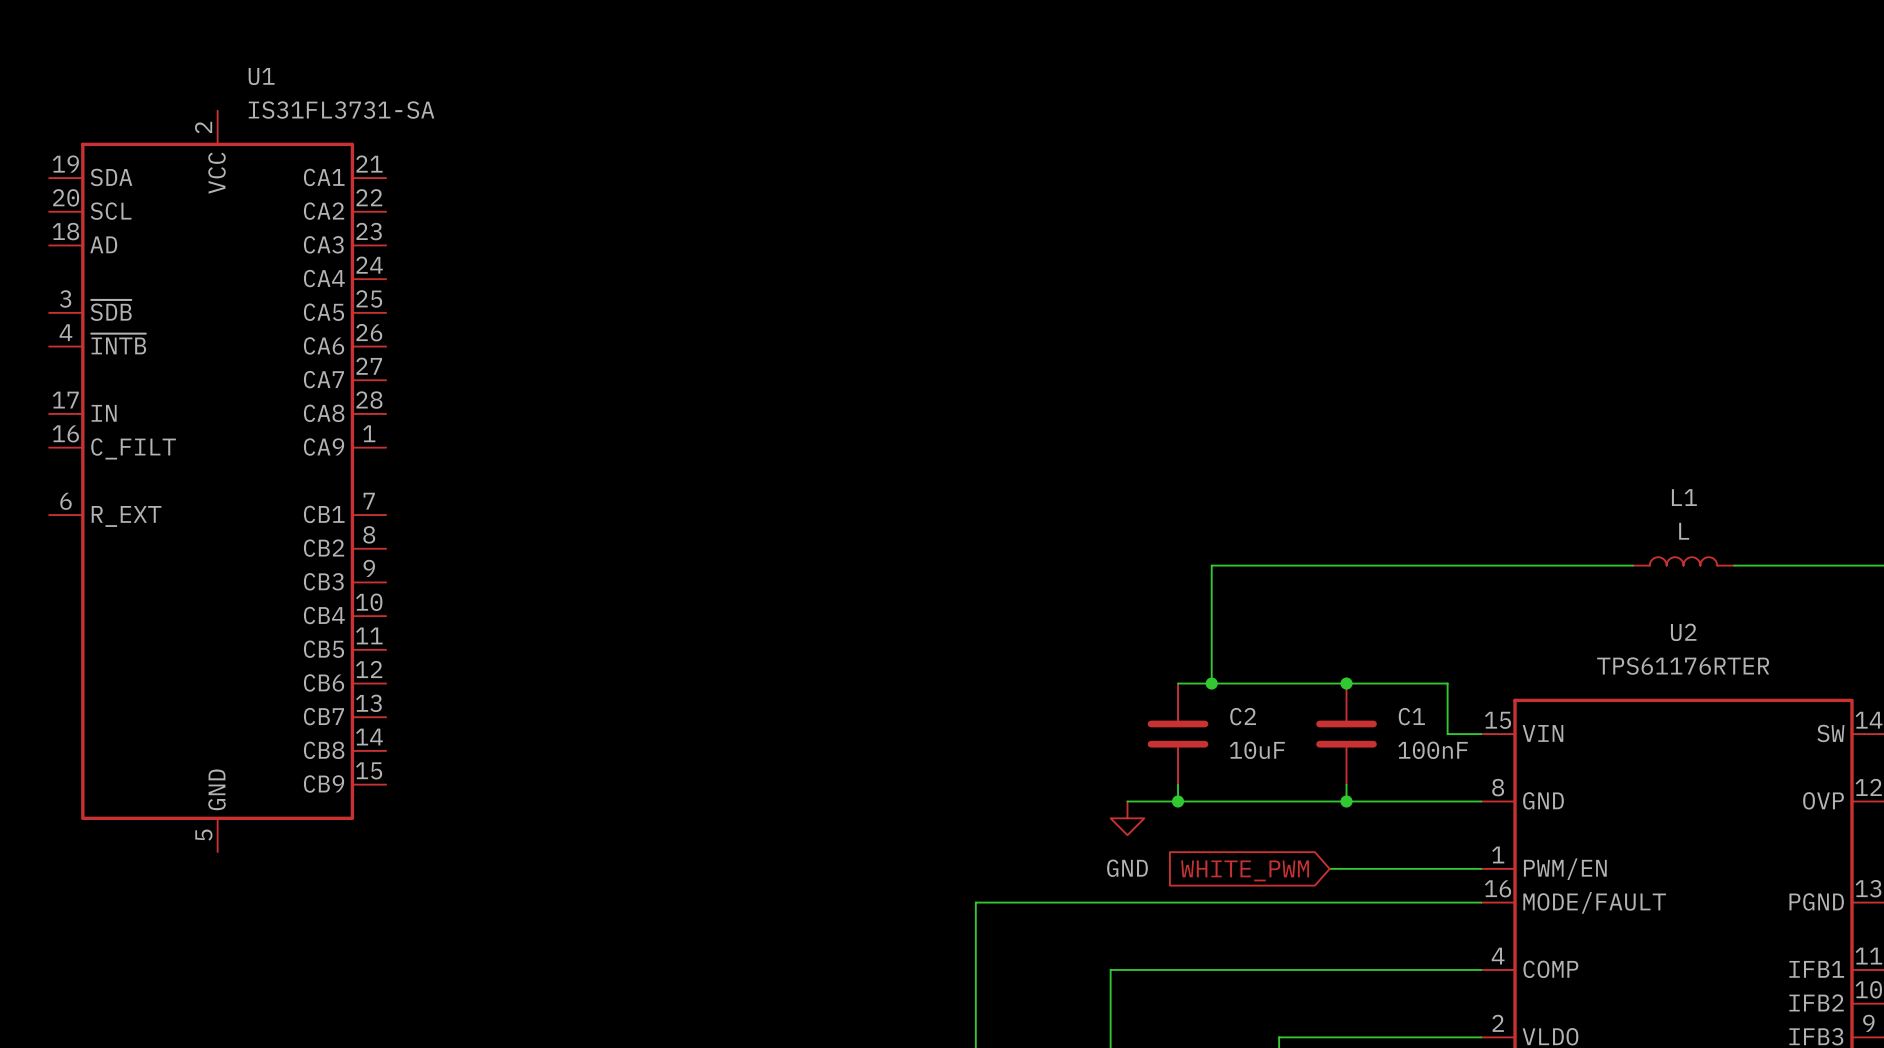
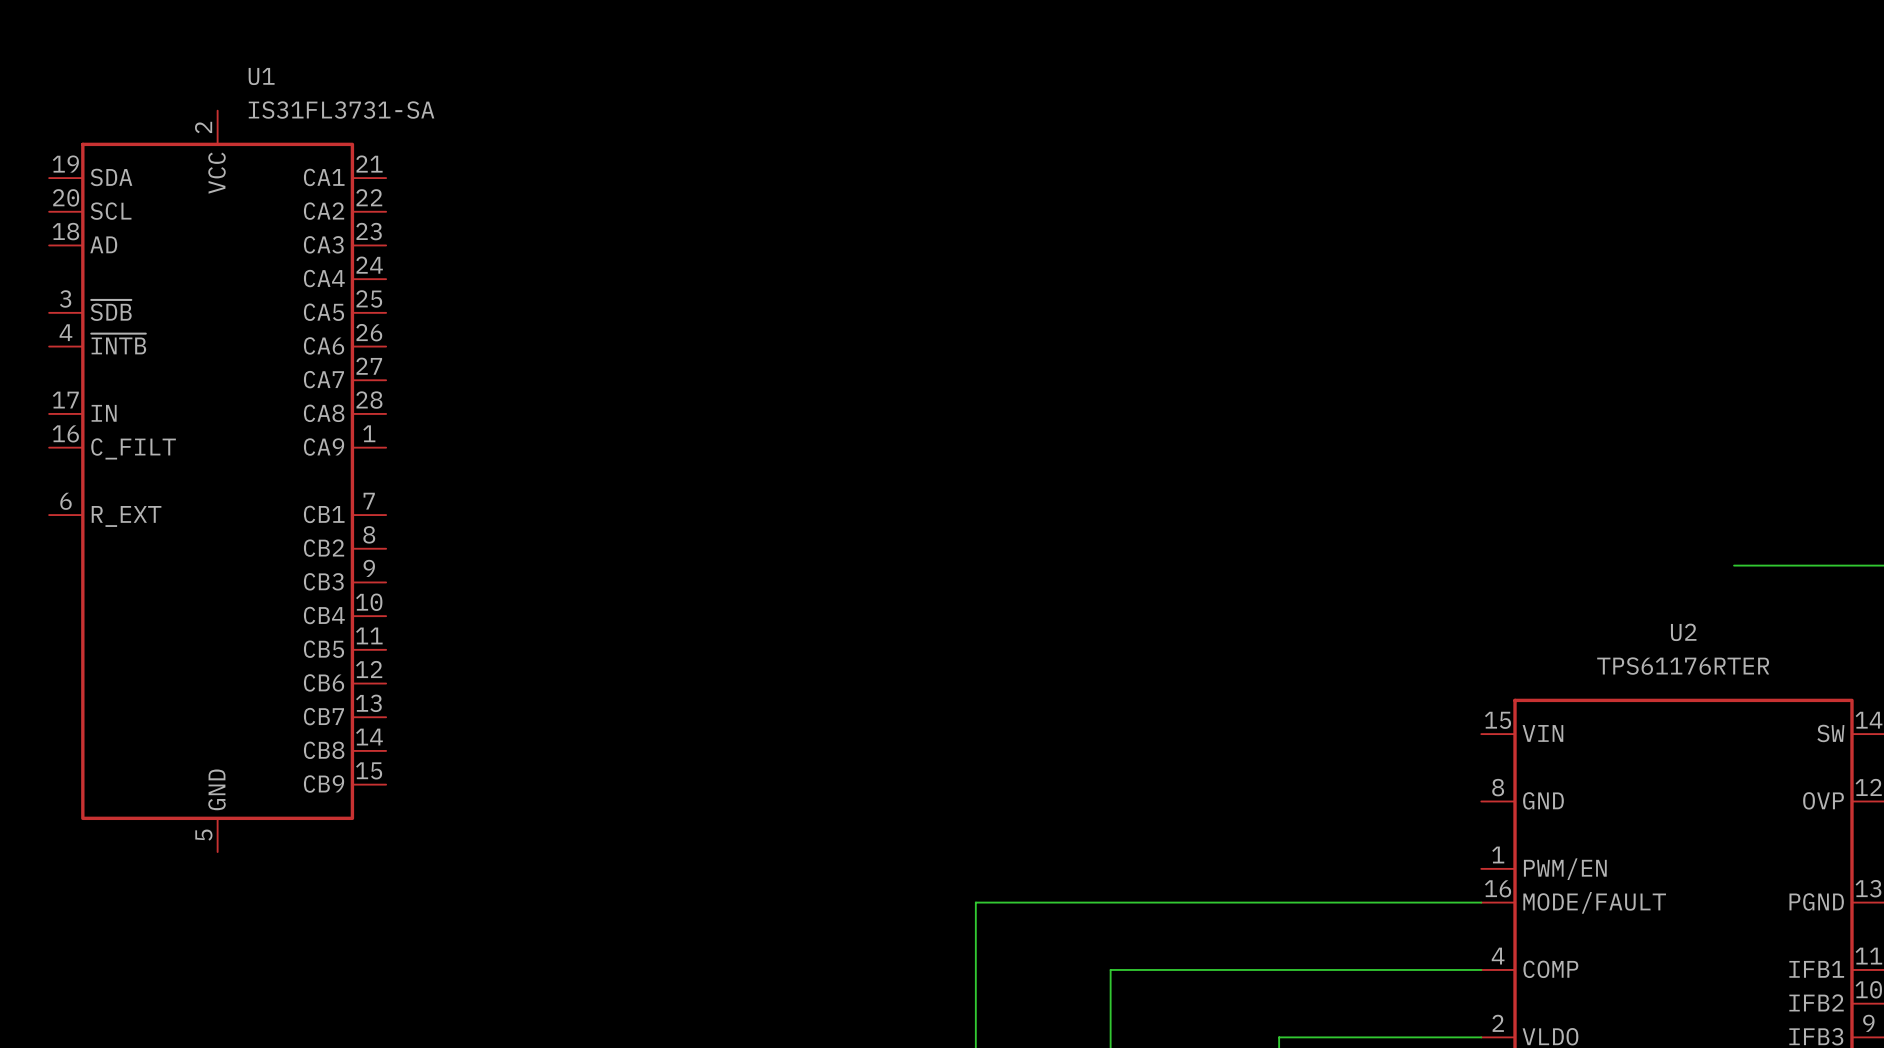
L1: L (1683, 561) -> none
wire: (1632, 565) (1211, 565) (1211, 683) -> none
wire: (1178, 683) (1447, 683) (1447, 734) (1481, 734) -> none
junction: (1211, 683) -> none
junction: (1346, 683) -> none
C2: 10uF (1178, 734) -> none
C1: 100nF (1346, 734) -> none
wire: (1178, 784) (1178, 801) -> none
wire: (1346, 784) (1346, 801) -> none
wire: (1127, 801) (1481, 801) -> none
junction: (1178, 801) -> none
junction: (1346, 801) -> none
power symbol: GND (1127, 818) -> none
wire: (1329, 868) (1481, 868) -> none
global label: WHITE_PWM (1245, 870) -> none

